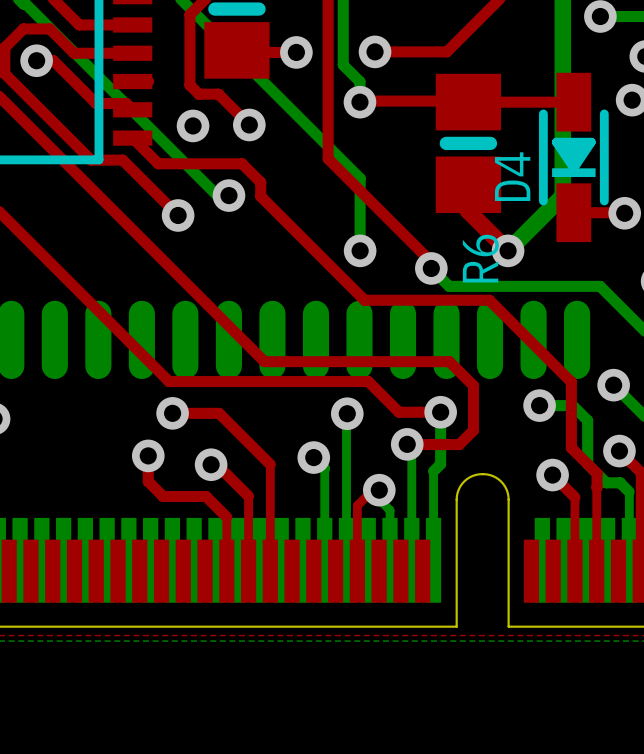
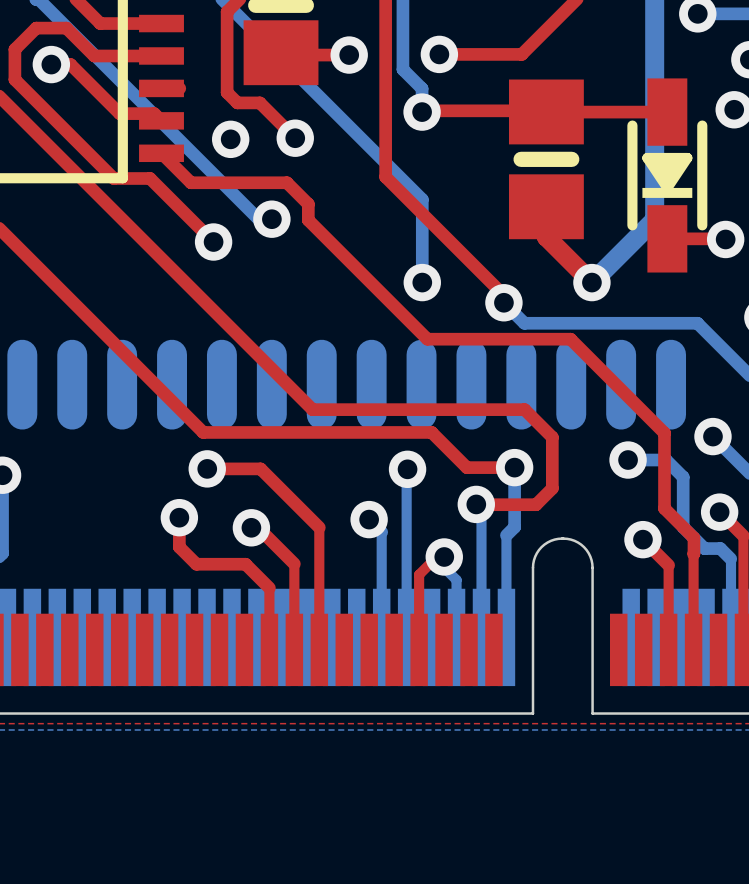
D4 name: D4 (512, 176) -> none
R6 name: R6 (480, 258) -> none

